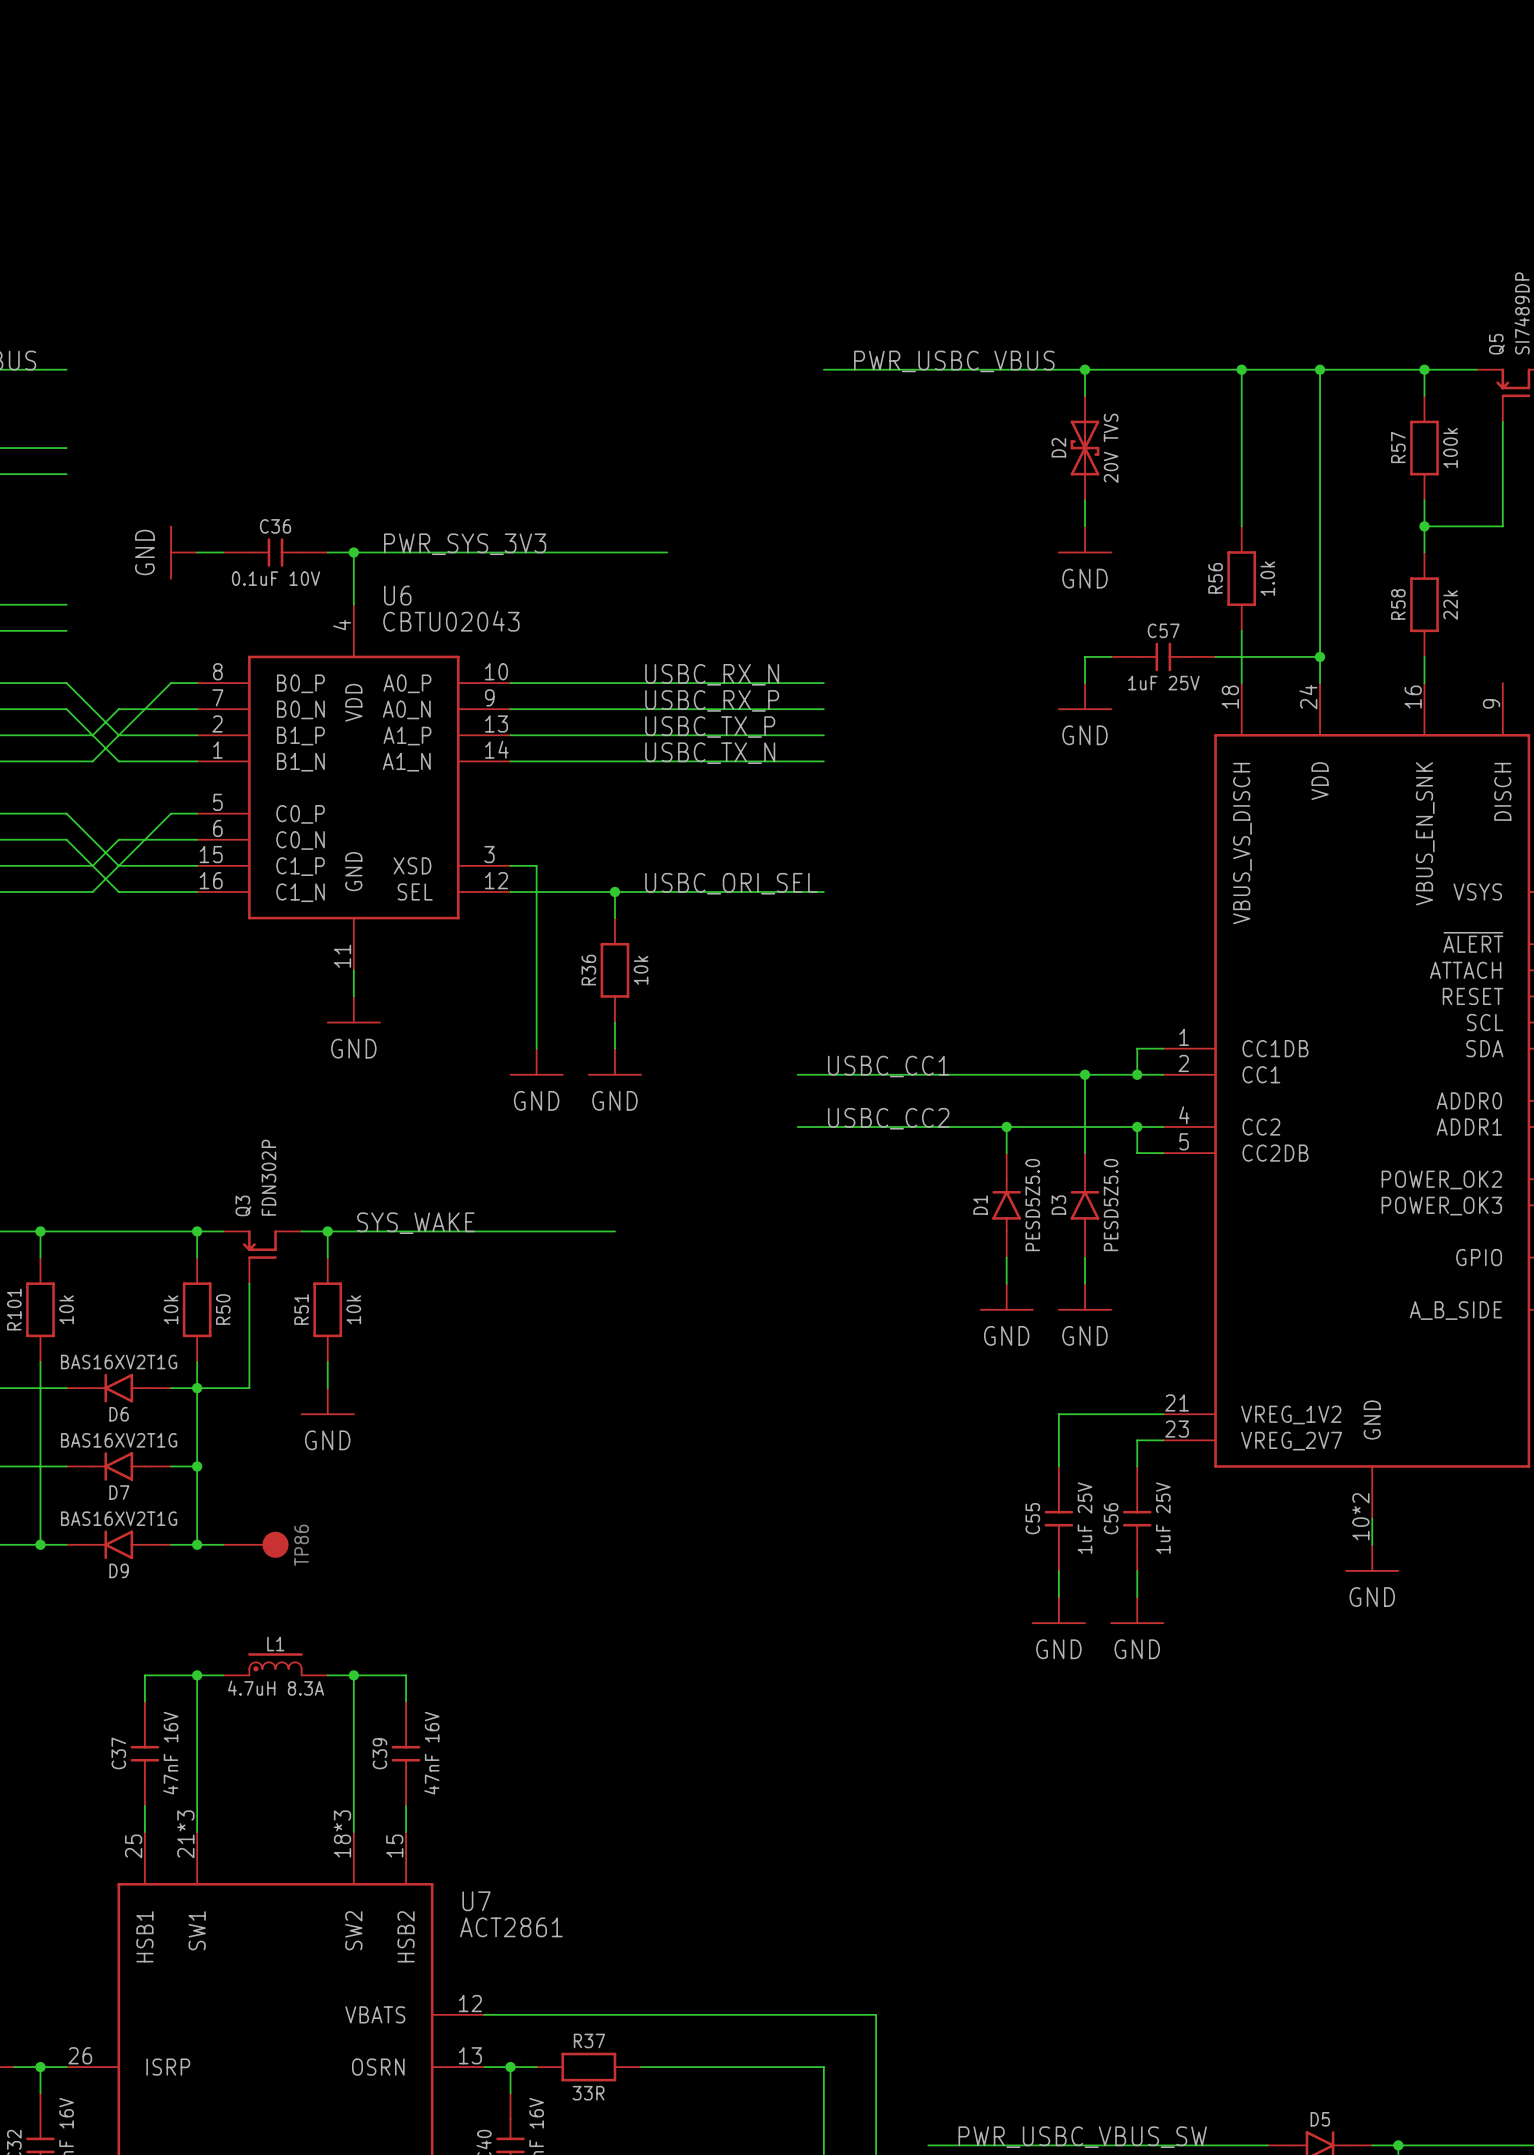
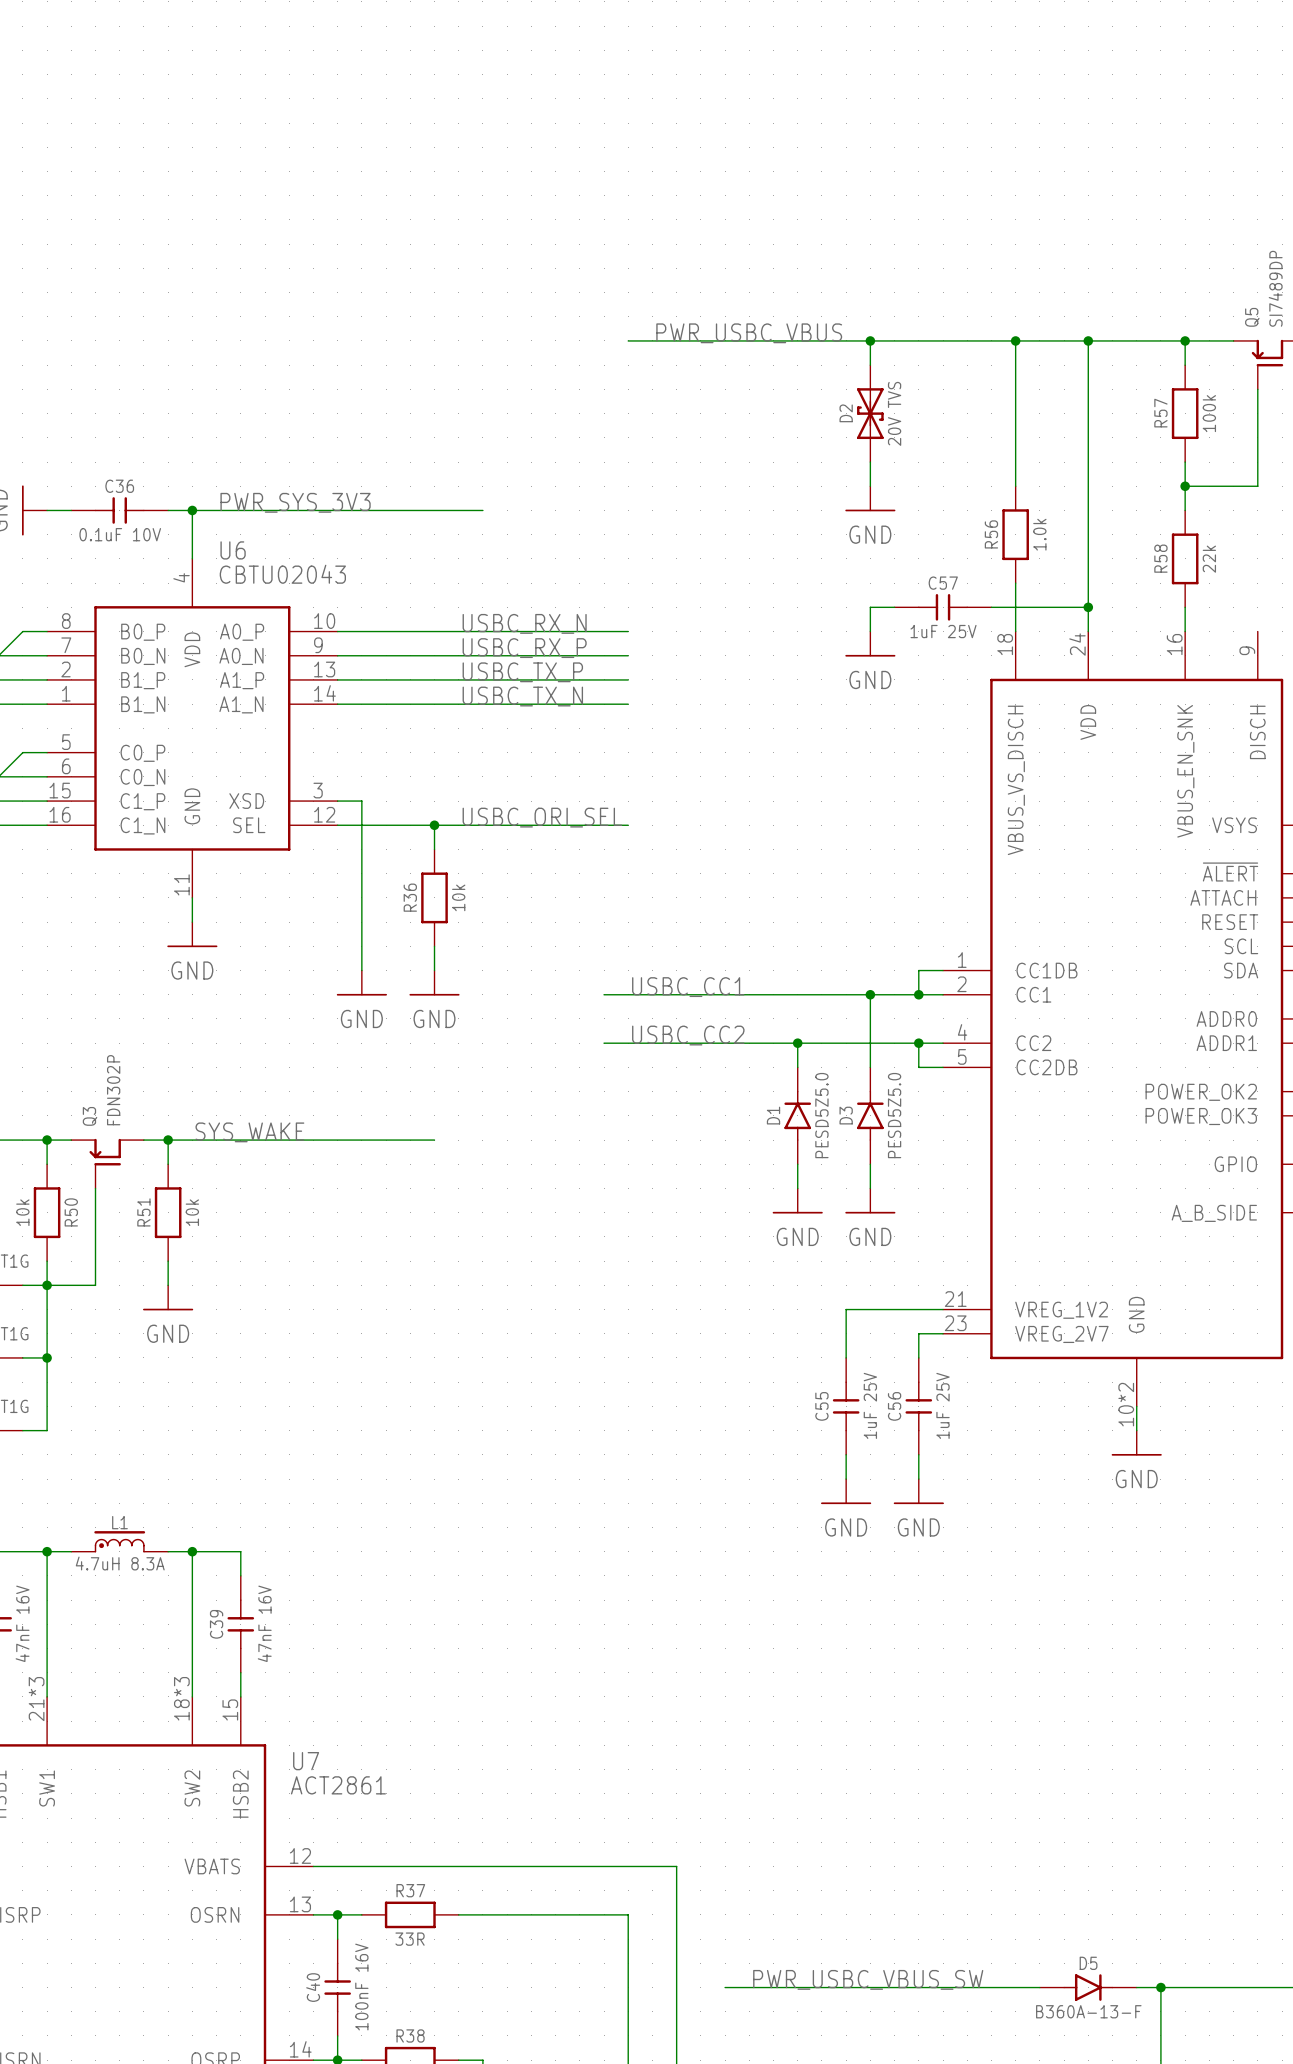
wire: (197, 1544) (223, 1544) -> none
junction: (197, 1544) -> none
TP86: (255, 1544) -> none

